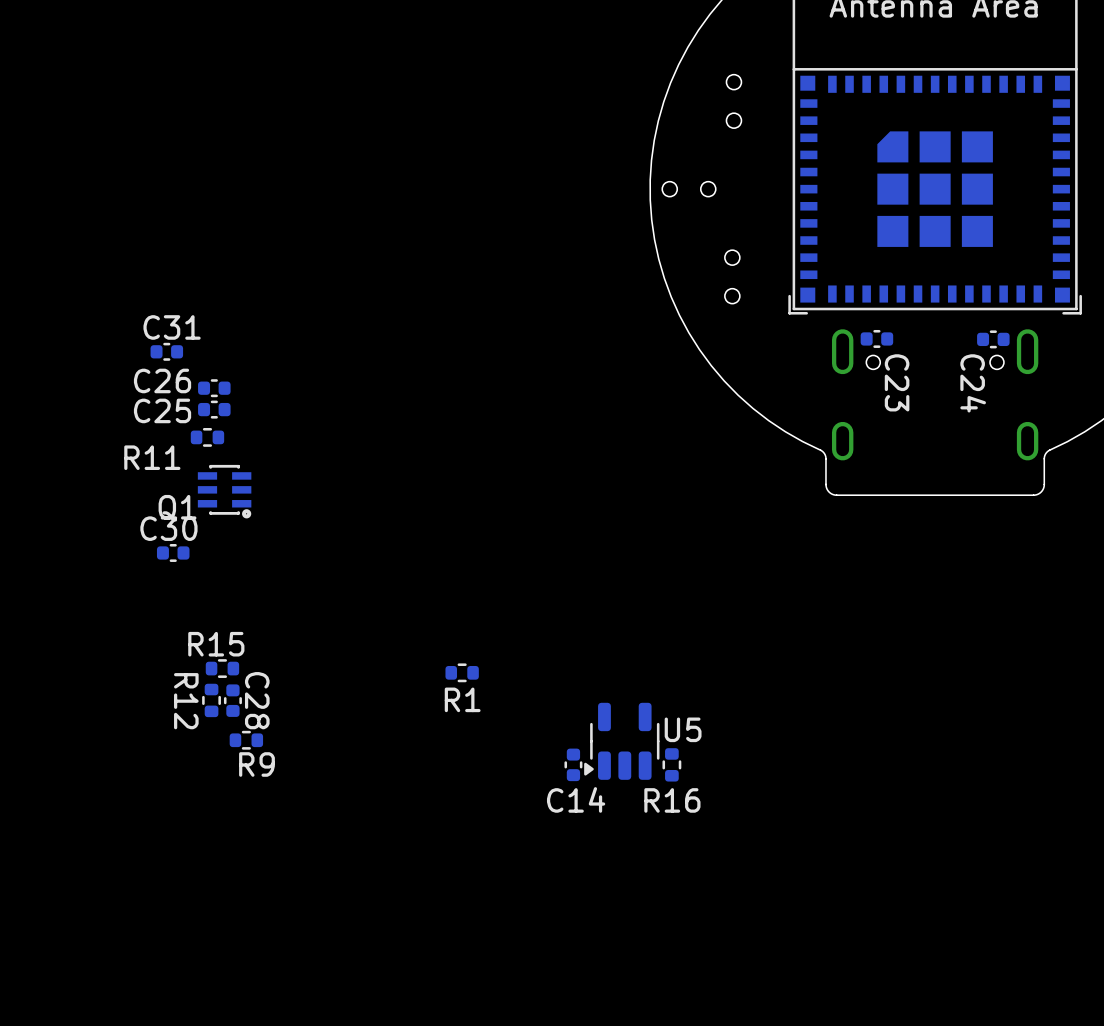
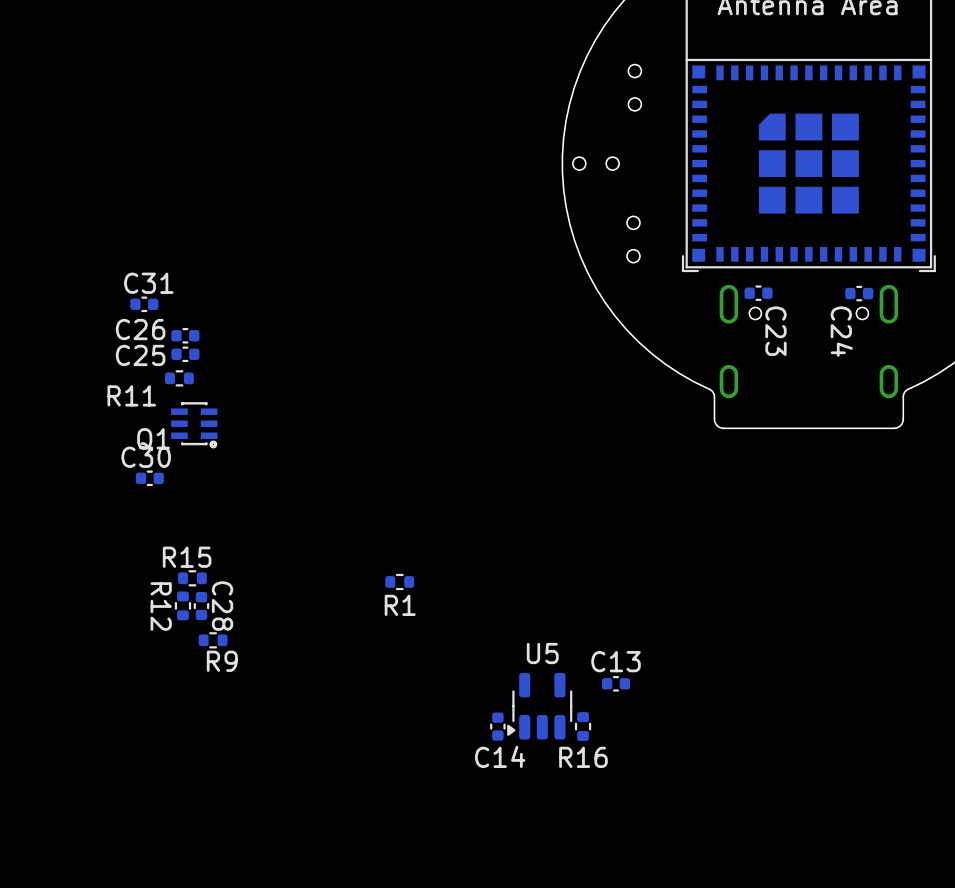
U5 name position: U5 (683, 729) -> U5 (542, 653)
U5 position: (621, 741) -> (539, 706)
C14 position: (573, 764) -> (497, 726)
R16 position: (671, 764) -> (583, 726)
C13: none -> (615, 683)

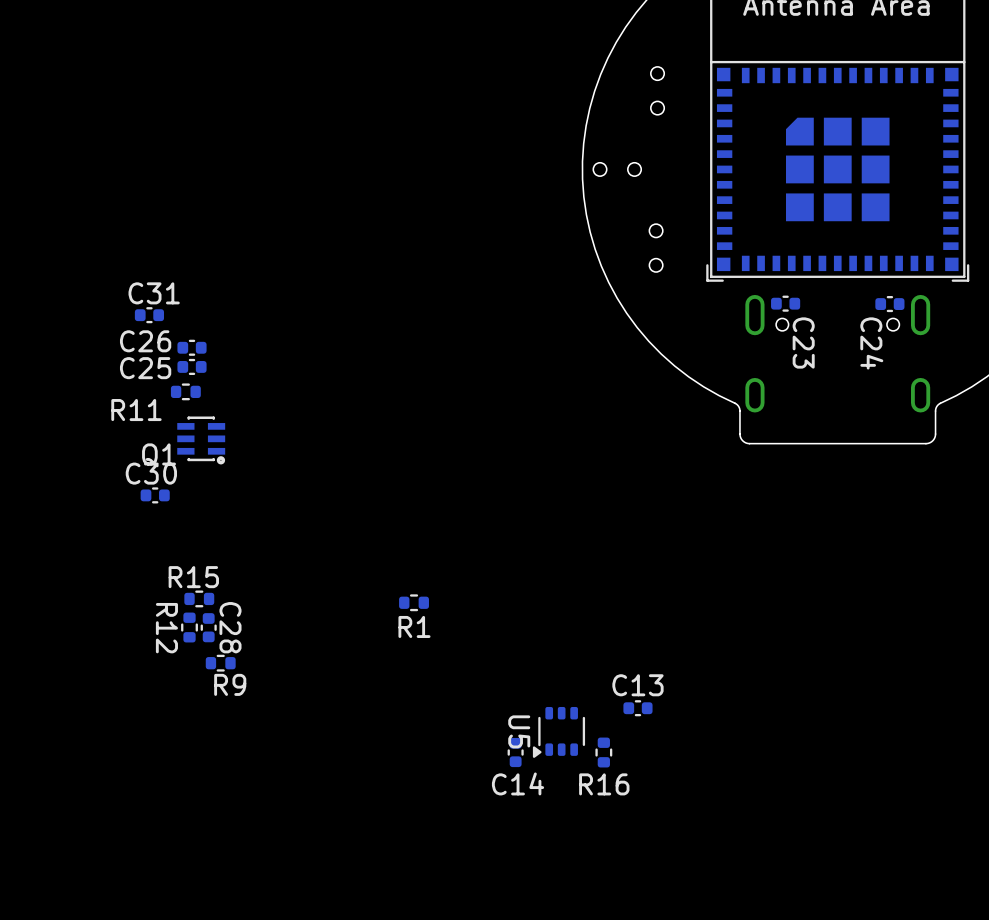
U5 name rotation: 0° (542, 653) -> 90° clockwise (519, 731)
U5 name position: U5 (542, 653) -> U5 (519, 731)
U5 footprint: [507, 672, 573, 740] -> [532, 706, 586, 758]

